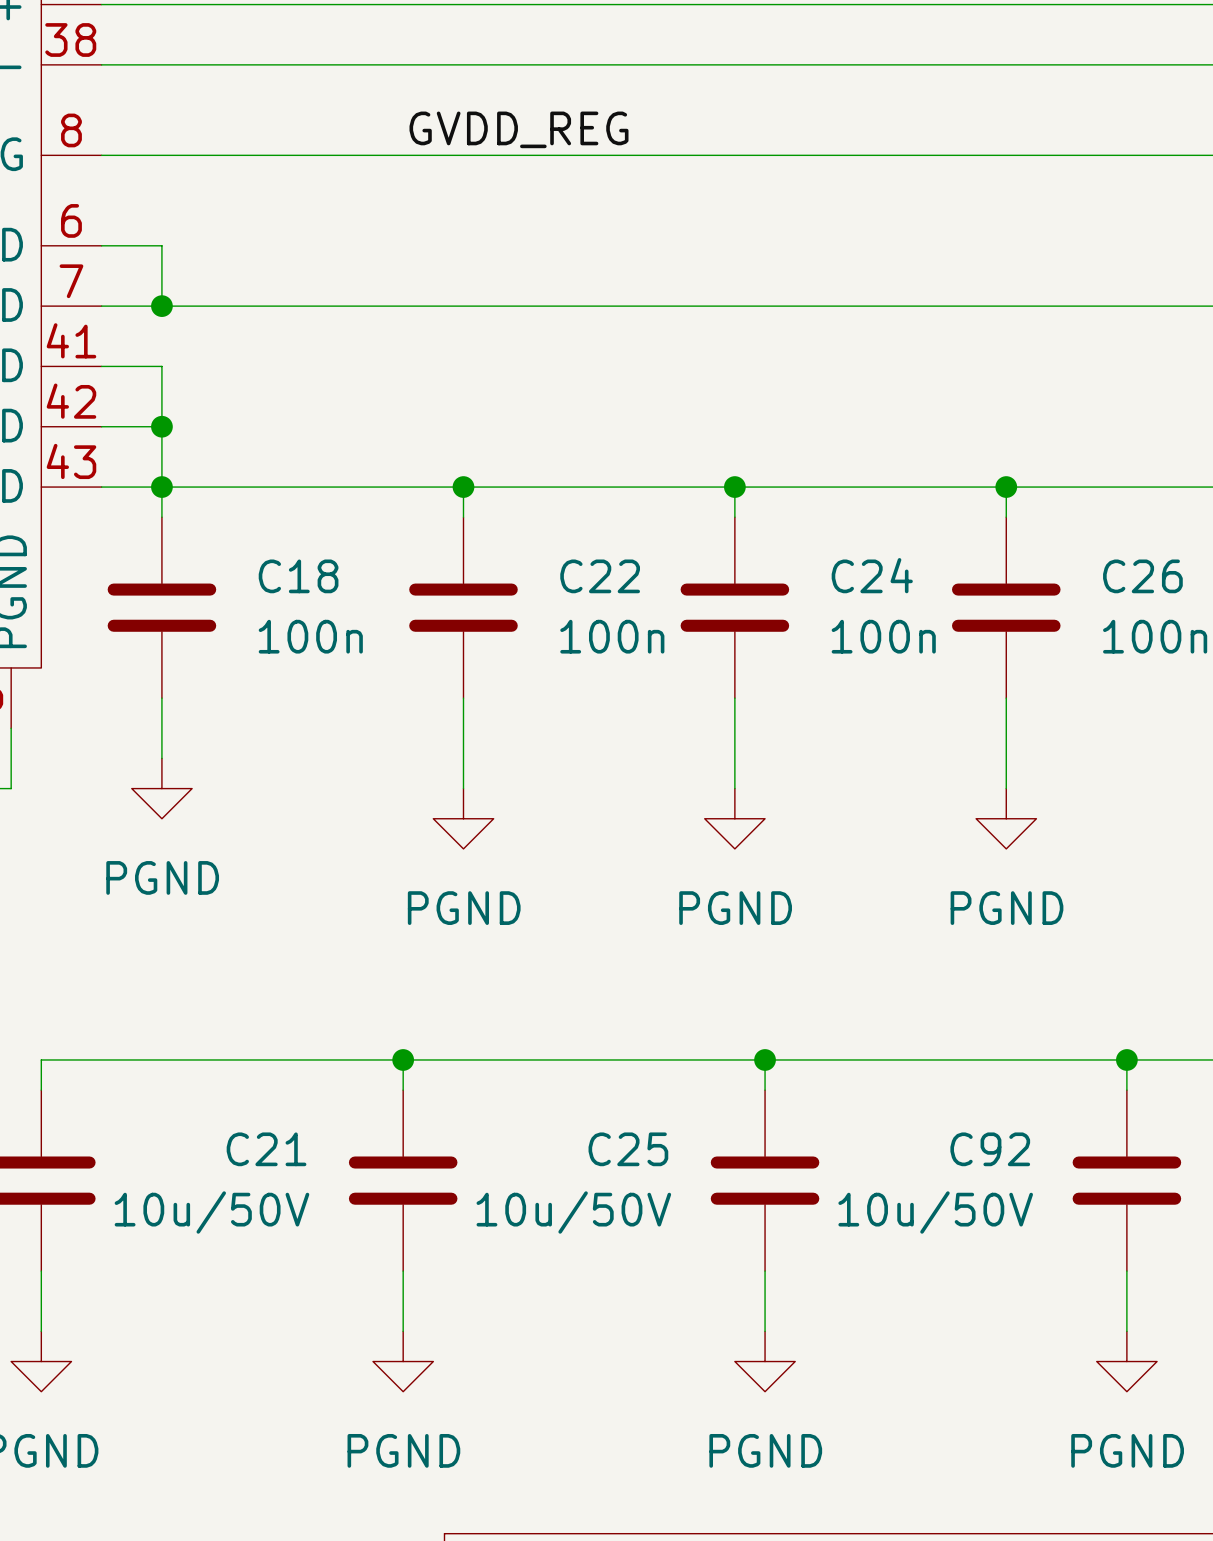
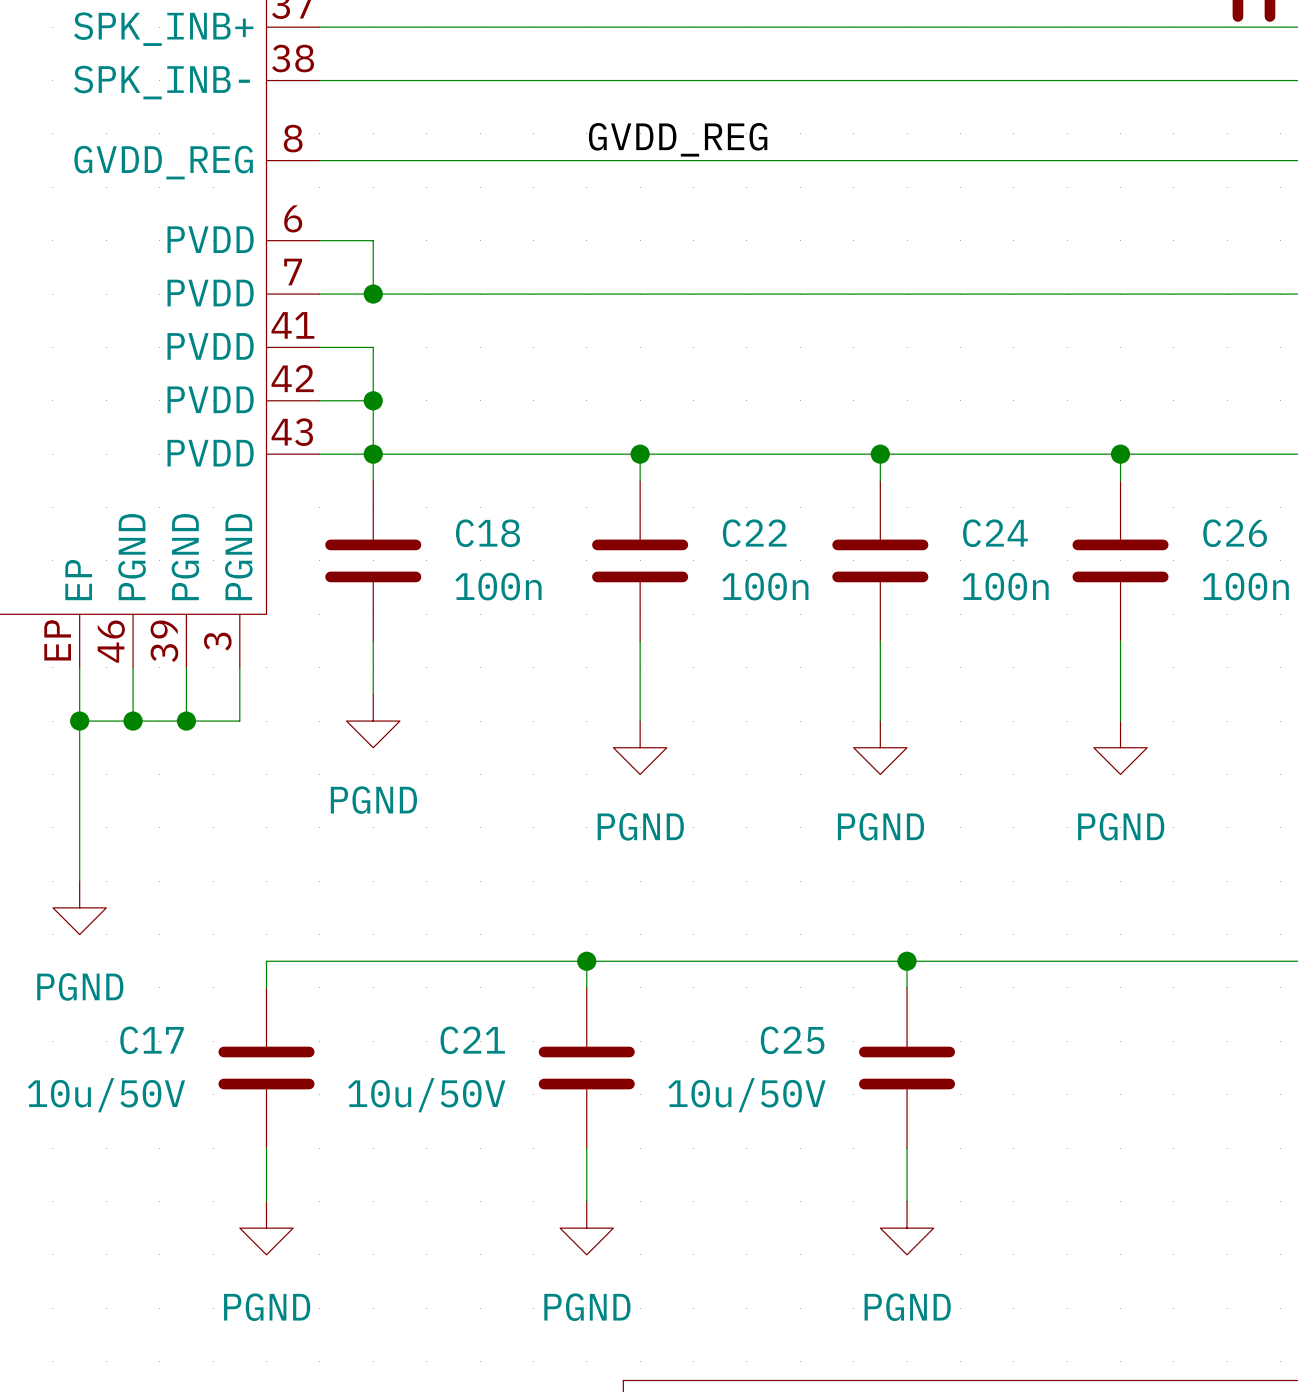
wire: (1126, 1059) (1126, 1090) -> none
junction: (1126, 1059) -> none
C92: 10u/50V (1126, 1180) -> none
wire: (1126, 1271) (1126, 1331) -> none
power symbol: PGND (1126, 1361) -> none

